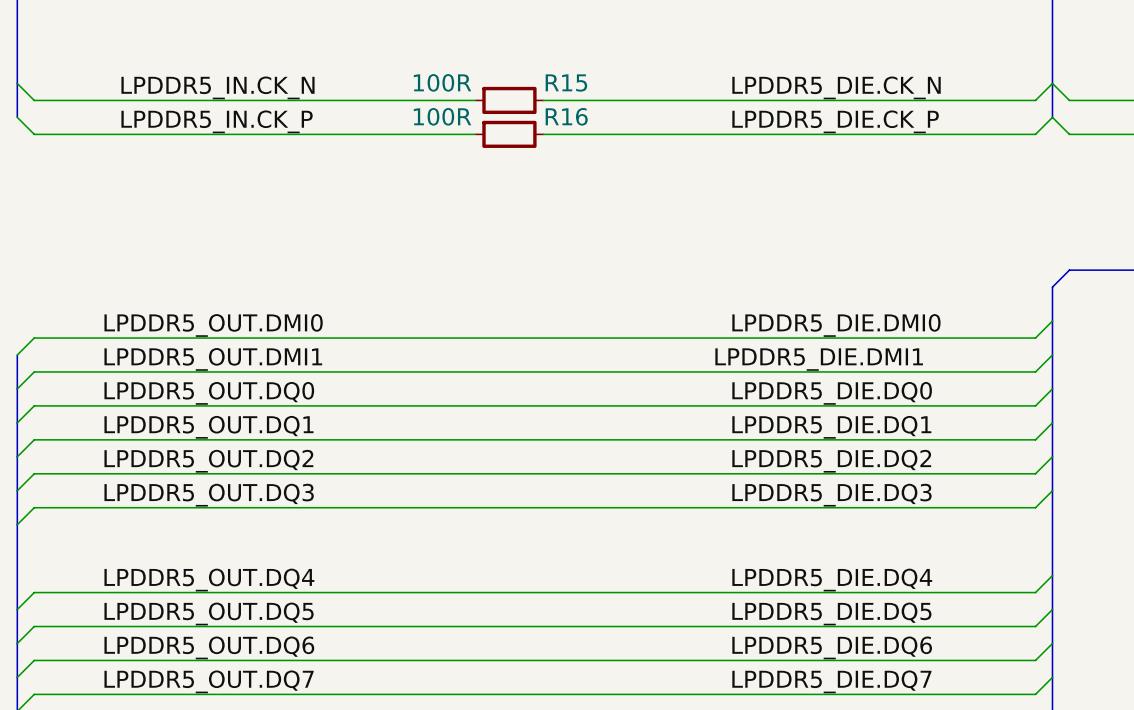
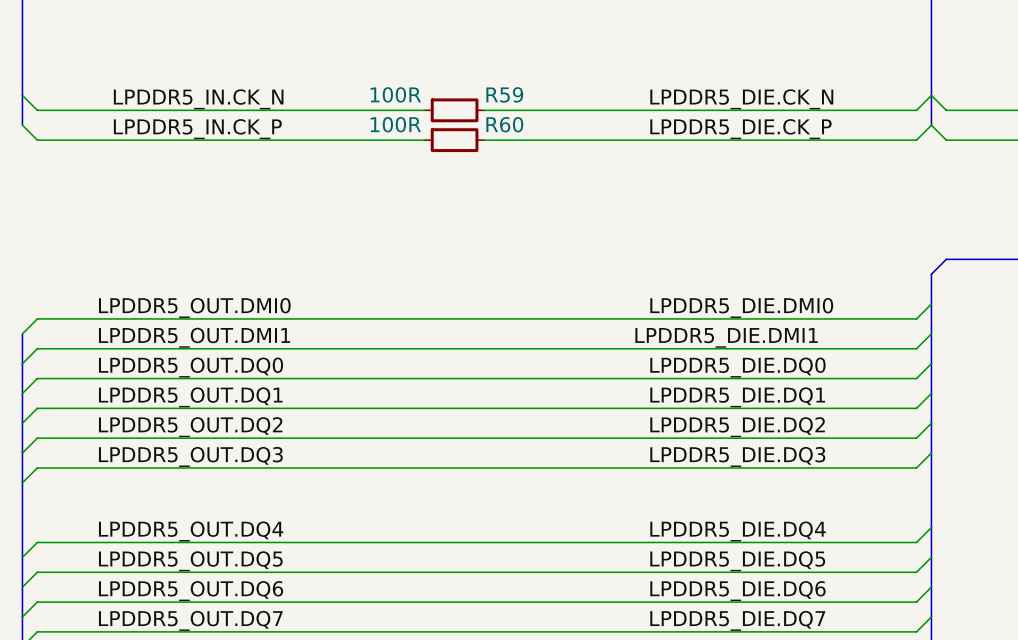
R15 name: R15 (566, 83) -> R59 (504, 94)
R16 name: R16 (566, 116) -> R60 (504, 124)

